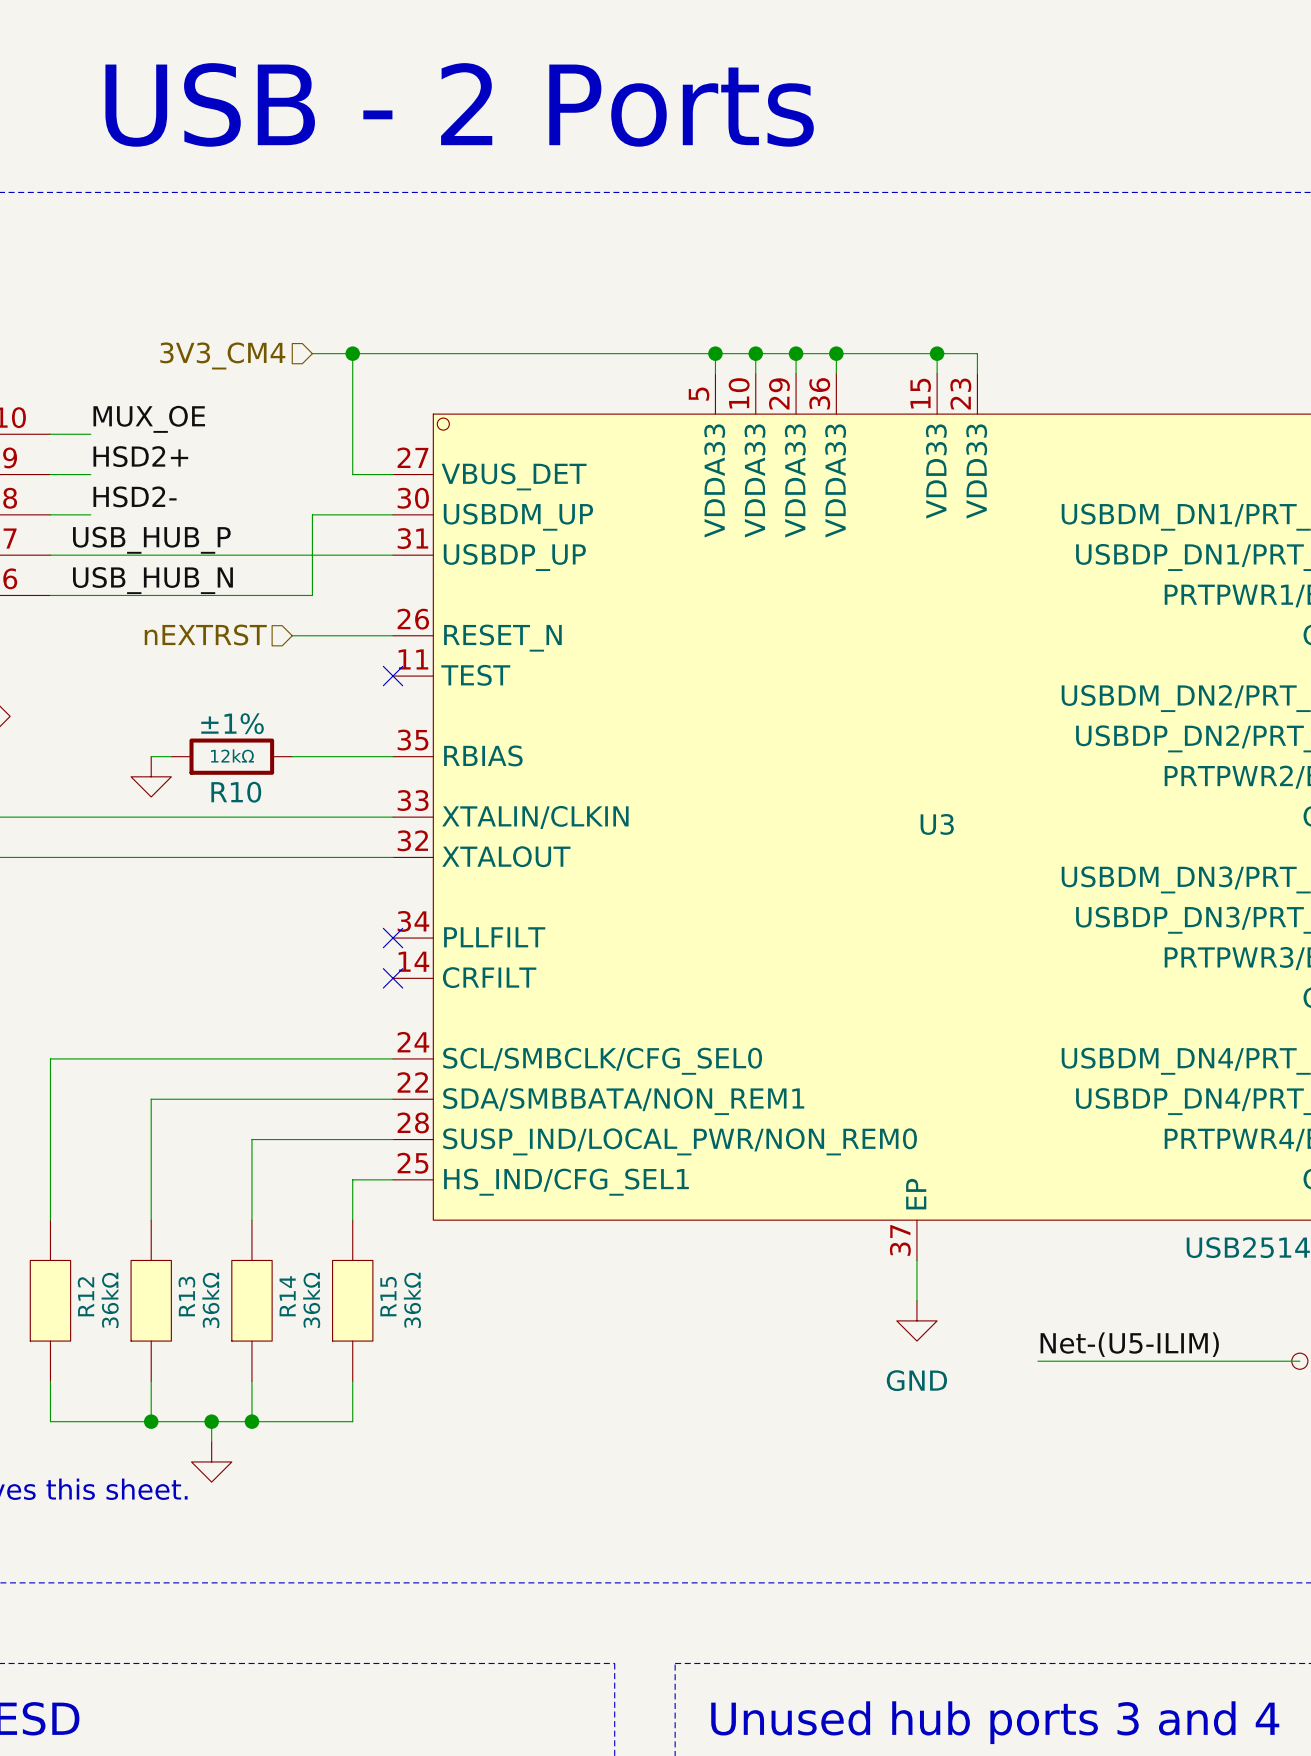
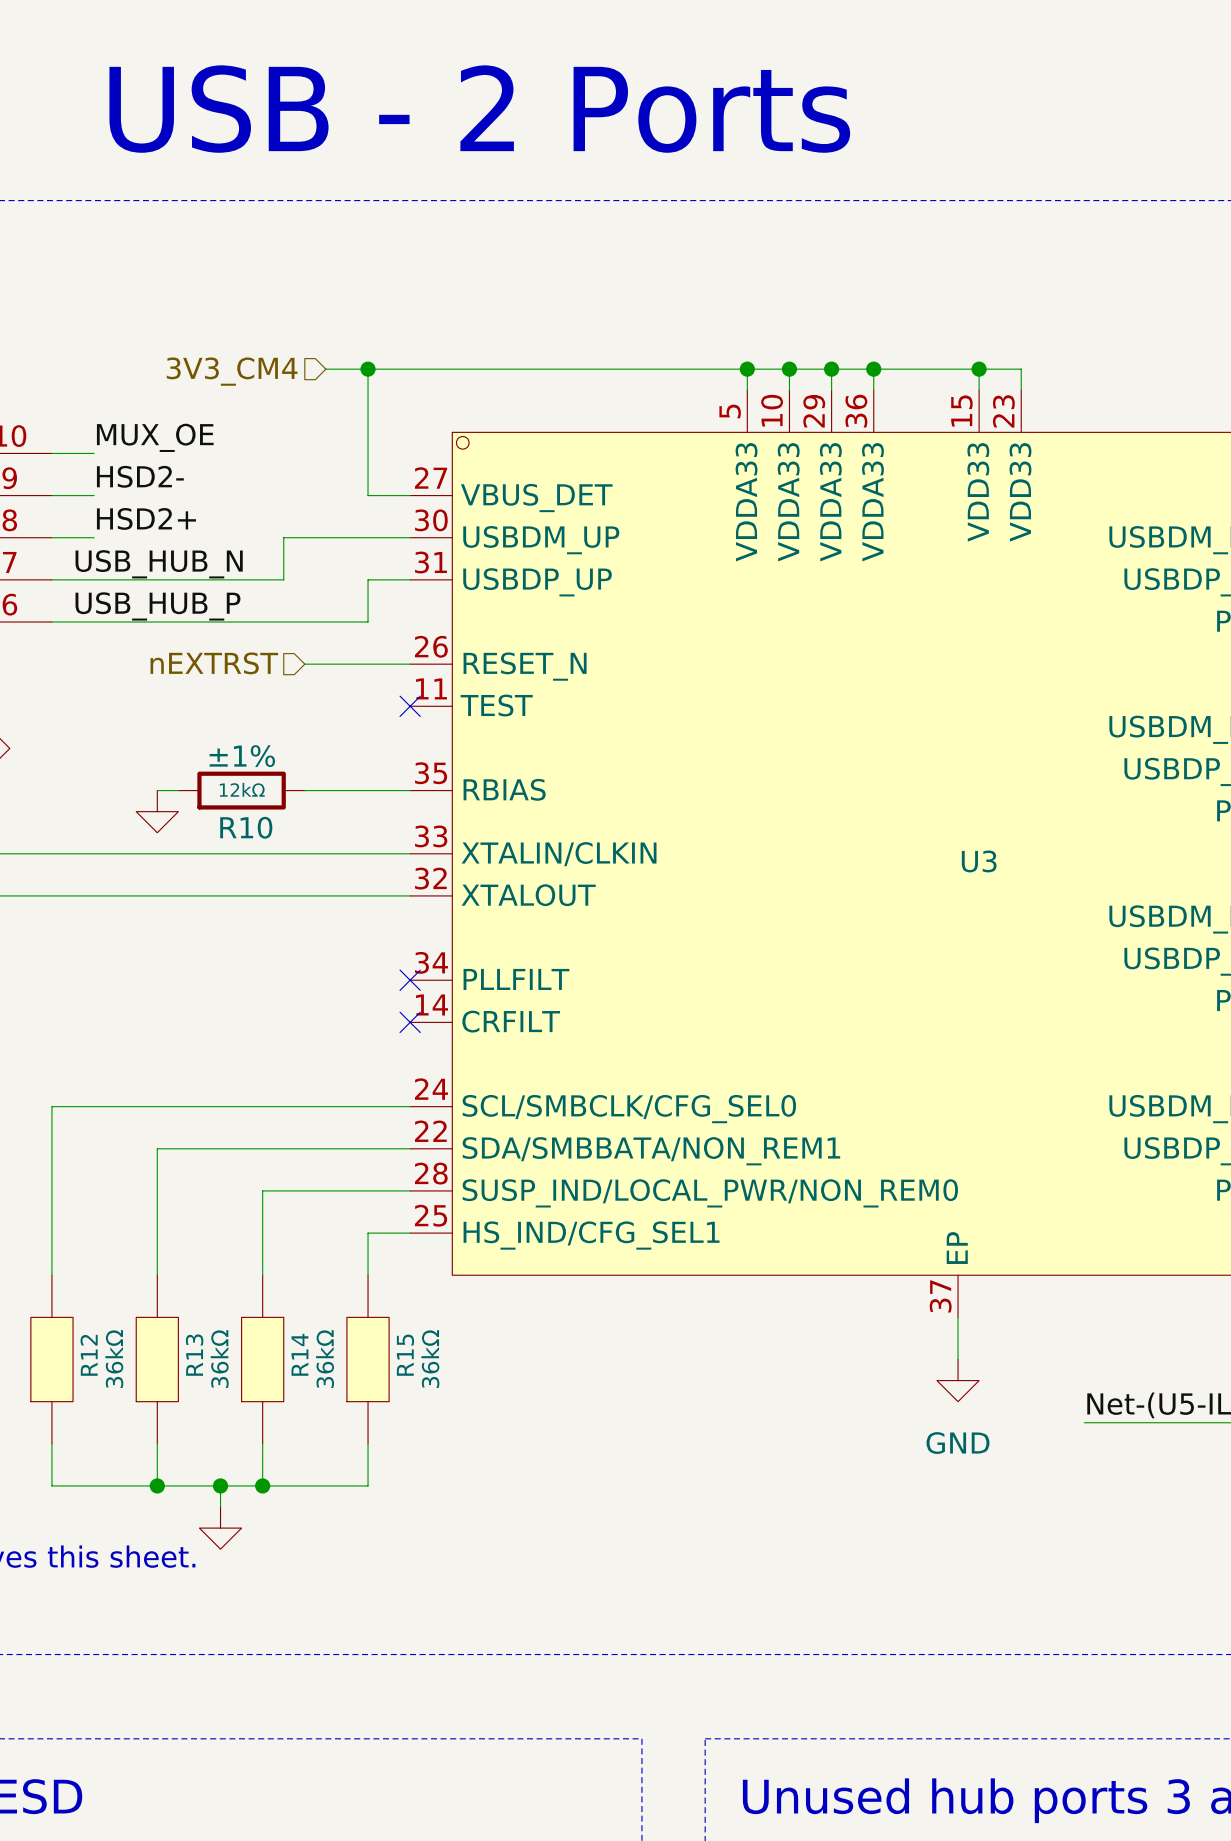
label: HSD2+ (140, 456) -> HSD2- (140, 476)
label: HSD2- (135, 496) -> HSD2+ (146, 518)
wire: (312, 514) (312, 595) -> (368, 579) (368, 622) (325, 622)
label: USB_HUB_P (151, 540) -> USB_HUB_N (159, 564)
wire: (272, 555) (352, 555) -> (283, 579) (283, 537) (325, 537)
label: USB_HUB_N (152, 580) -> USB_HUB_P (157, 606)

